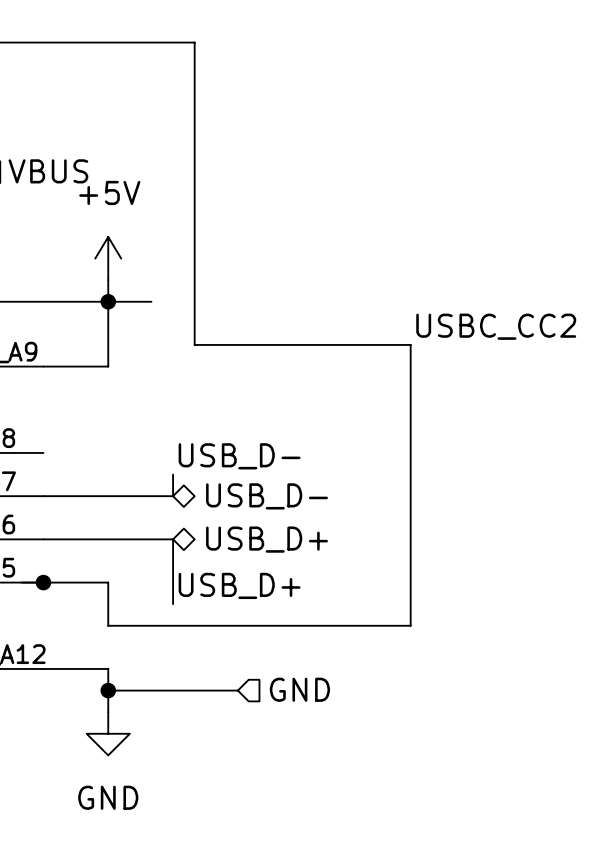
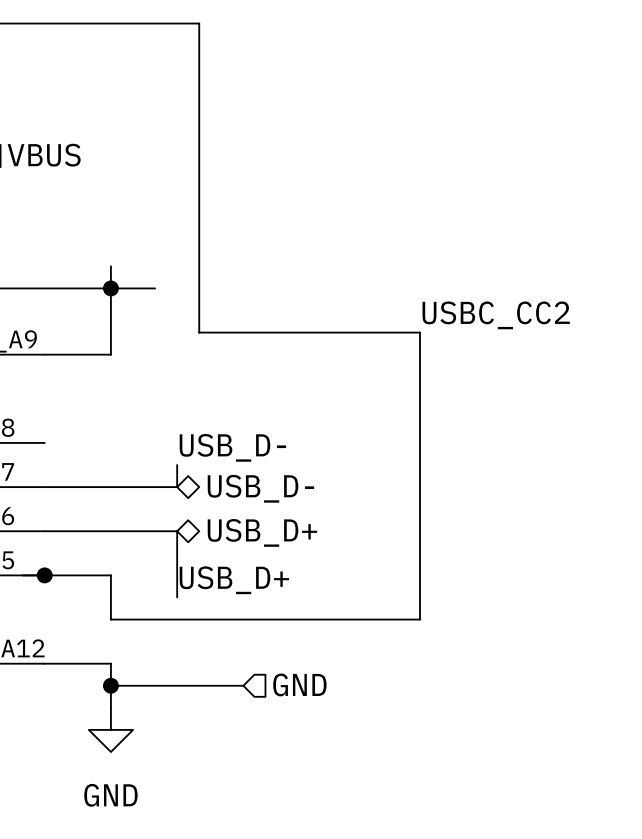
power symbol: +5V (108, 258) -> none

